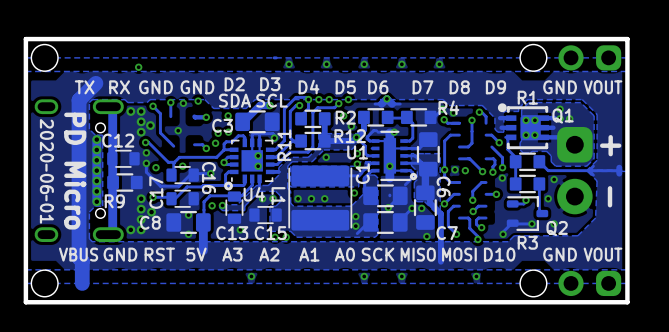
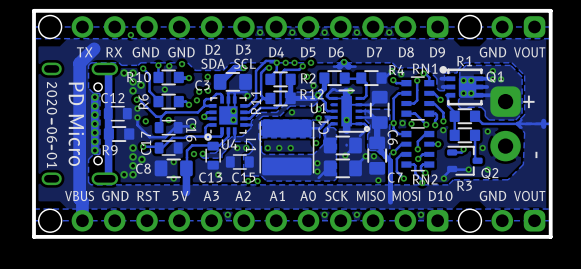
part: none -> (260, 26)
R10: none -> (168, 77)
RN1: none -> (417, 98)
R6: none -> (168, 101)
RN2: none -> (417, 149)
part: none -> (260, 220)

